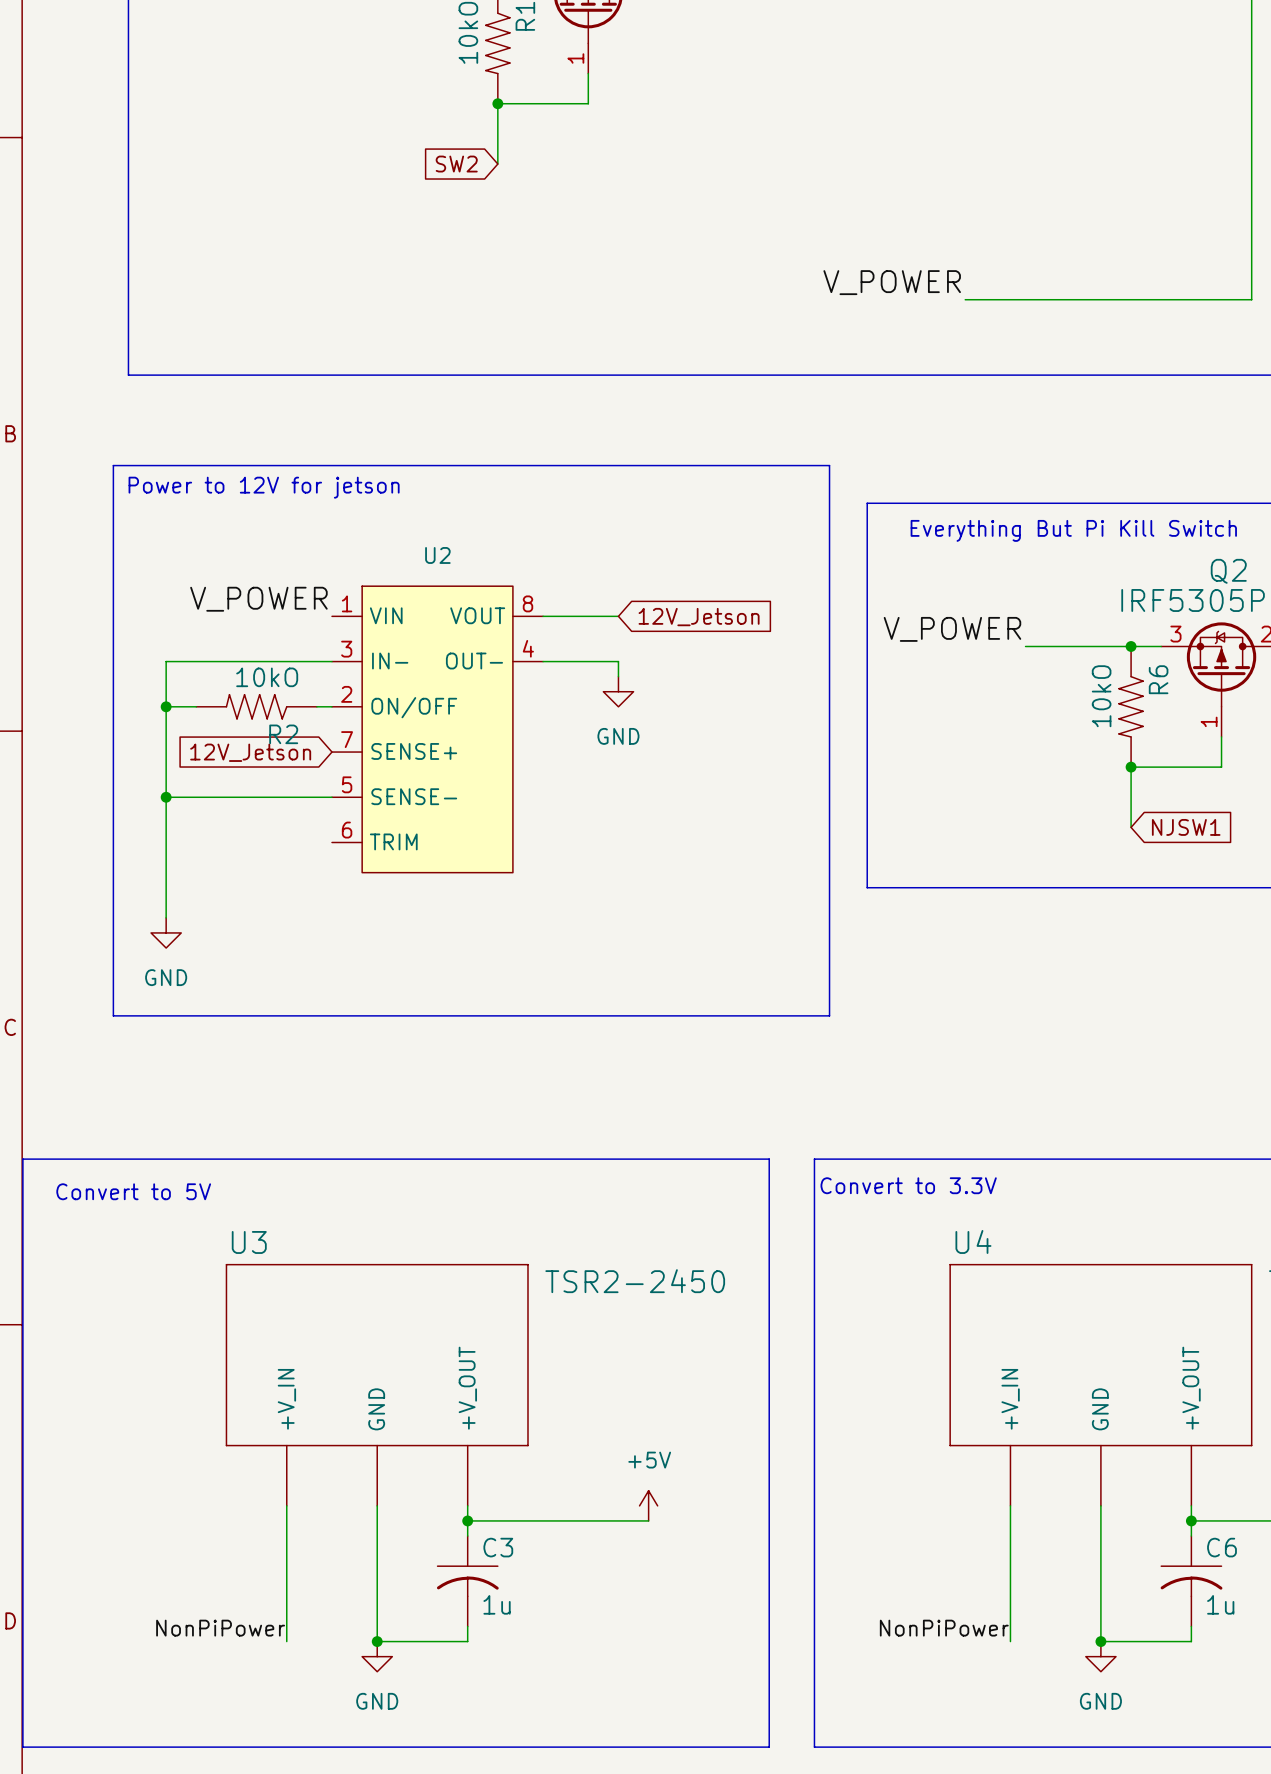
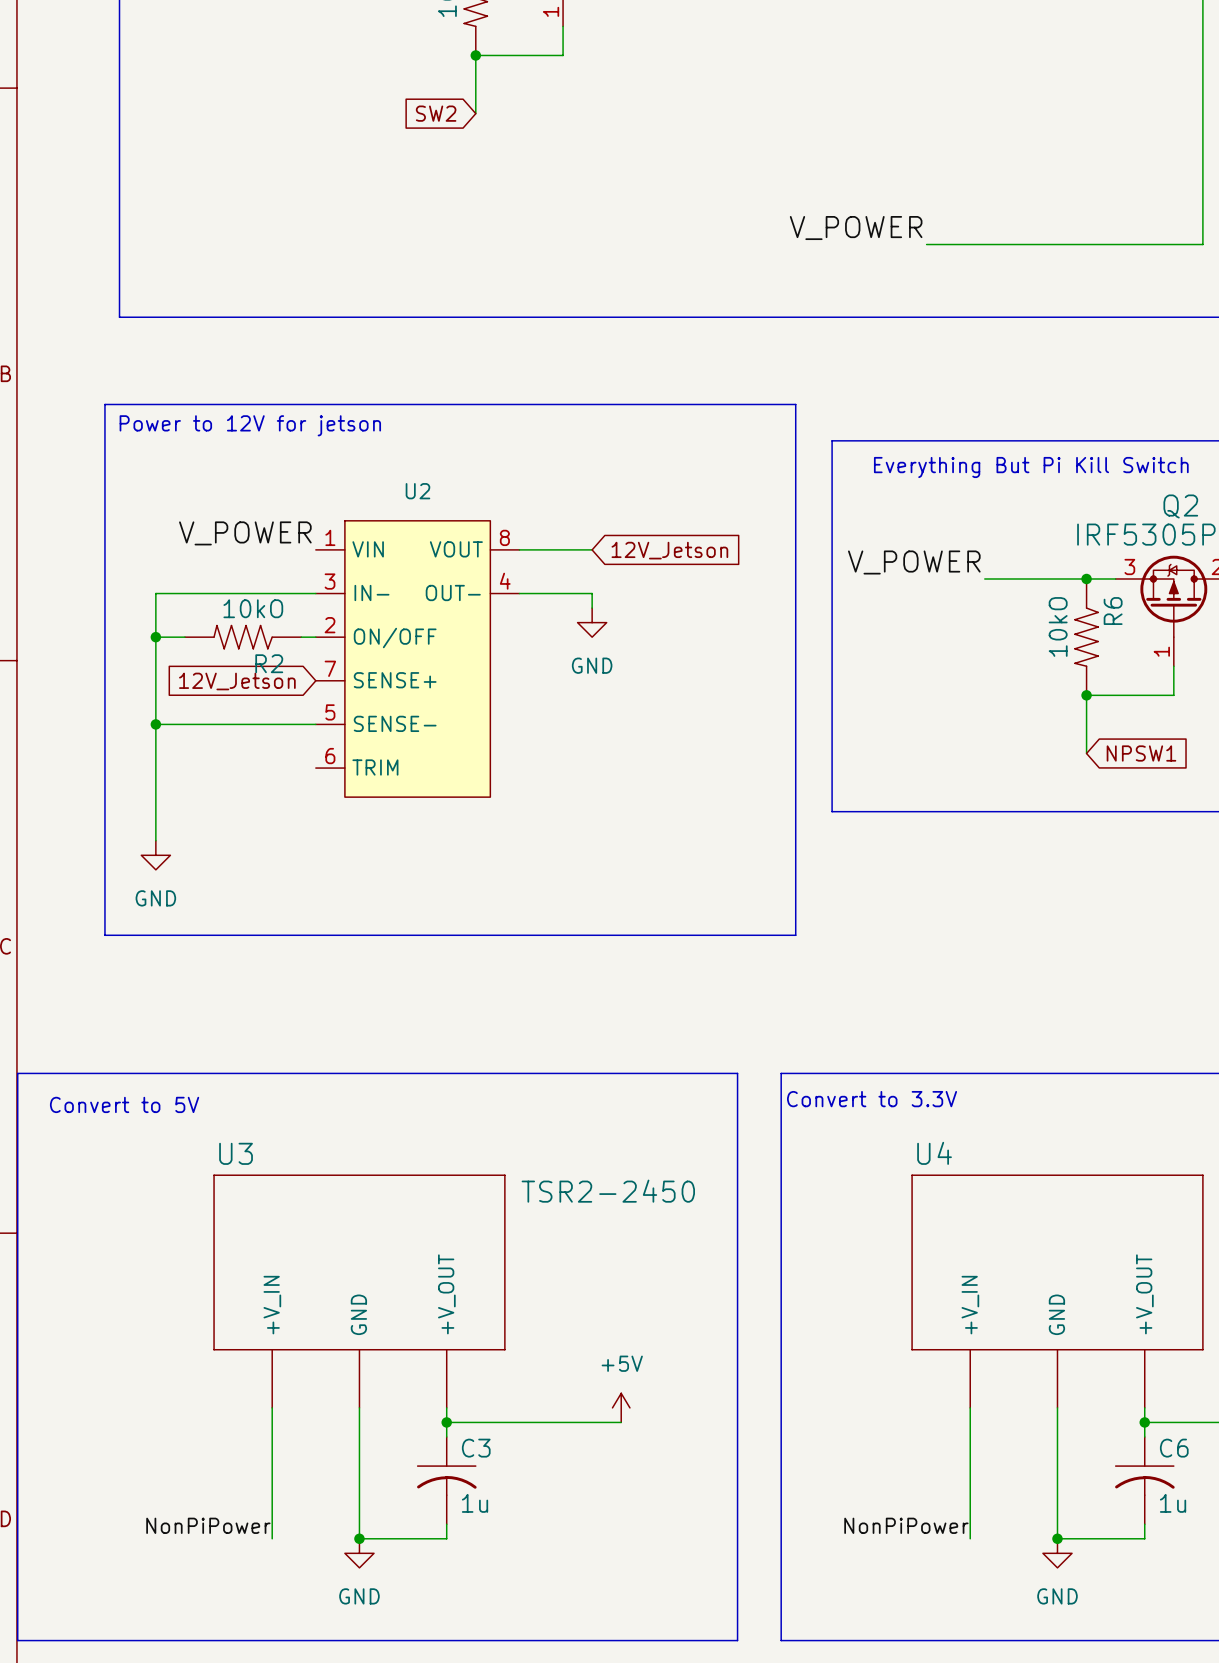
global label: NJSW1 (1186, 827) -> NPSW1 (1141, 753)

